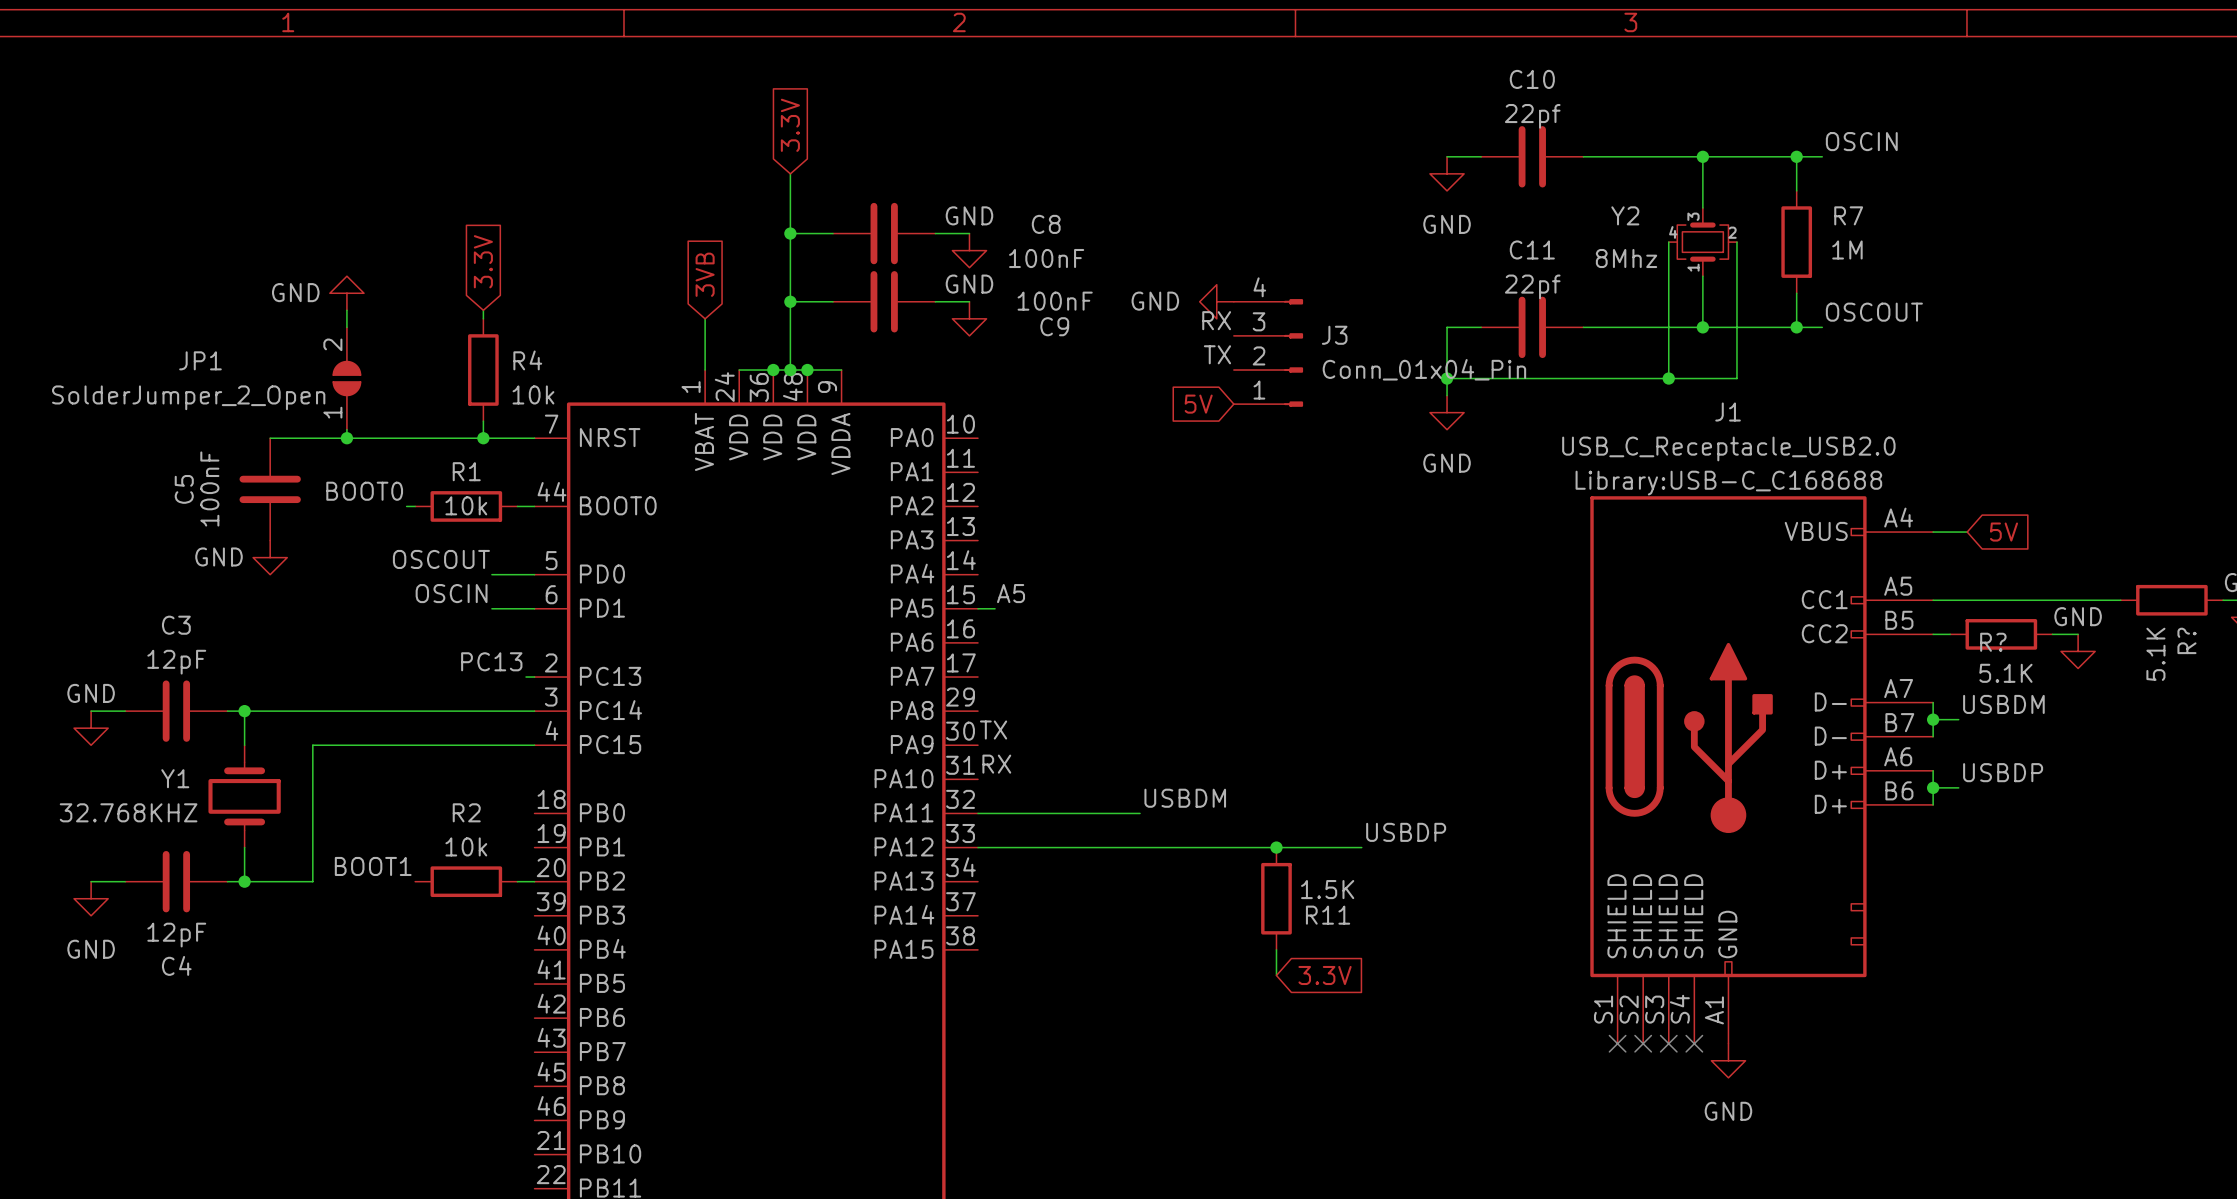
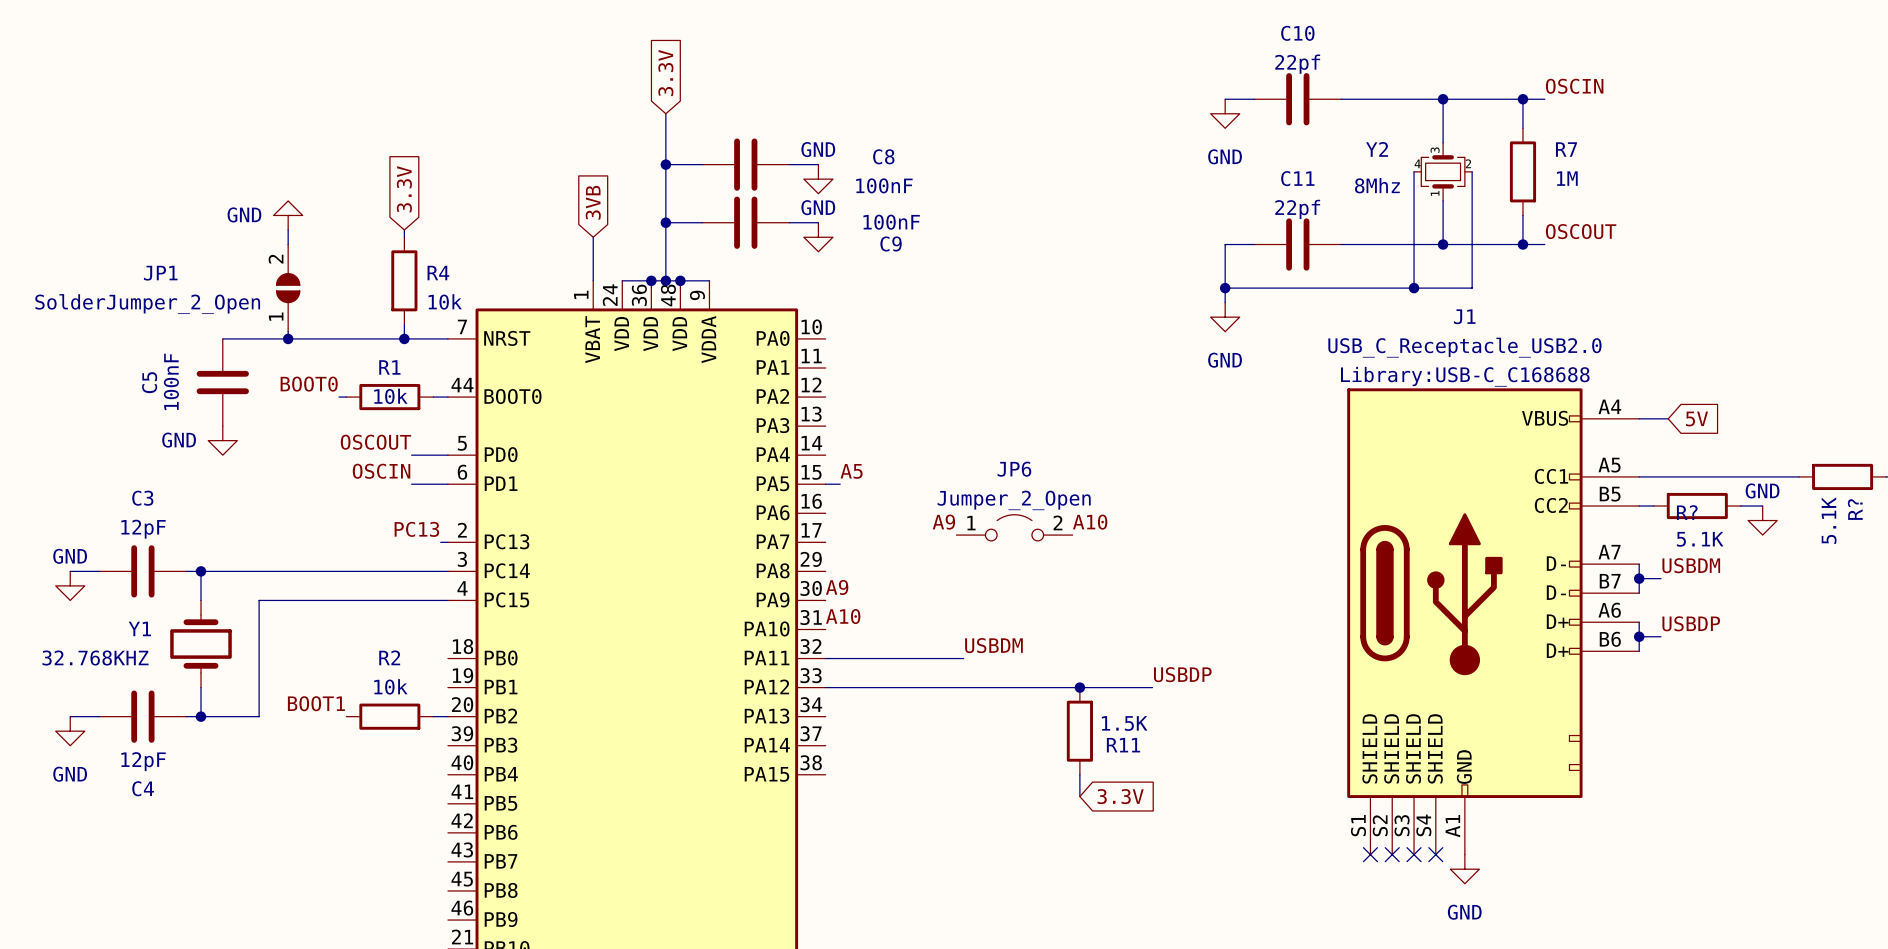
power symbol: GND (1216, 301) -> none
label: RX (1216, 320) -> none
J3: Conn_01x04_Pin (1268, 352) -> none
label: TX (1217, 354) -> none
global label: 5V (1198, 404) -> none
label: none -> A9 (943, 522)
label: none -> A10 (1090, 522)
JP6: none -> Jumper_2_Open (1014, 527)
label: TX (993, 730) -> A9 (837, 587)
label: RX (996, 764) -> A10 (843, 616)

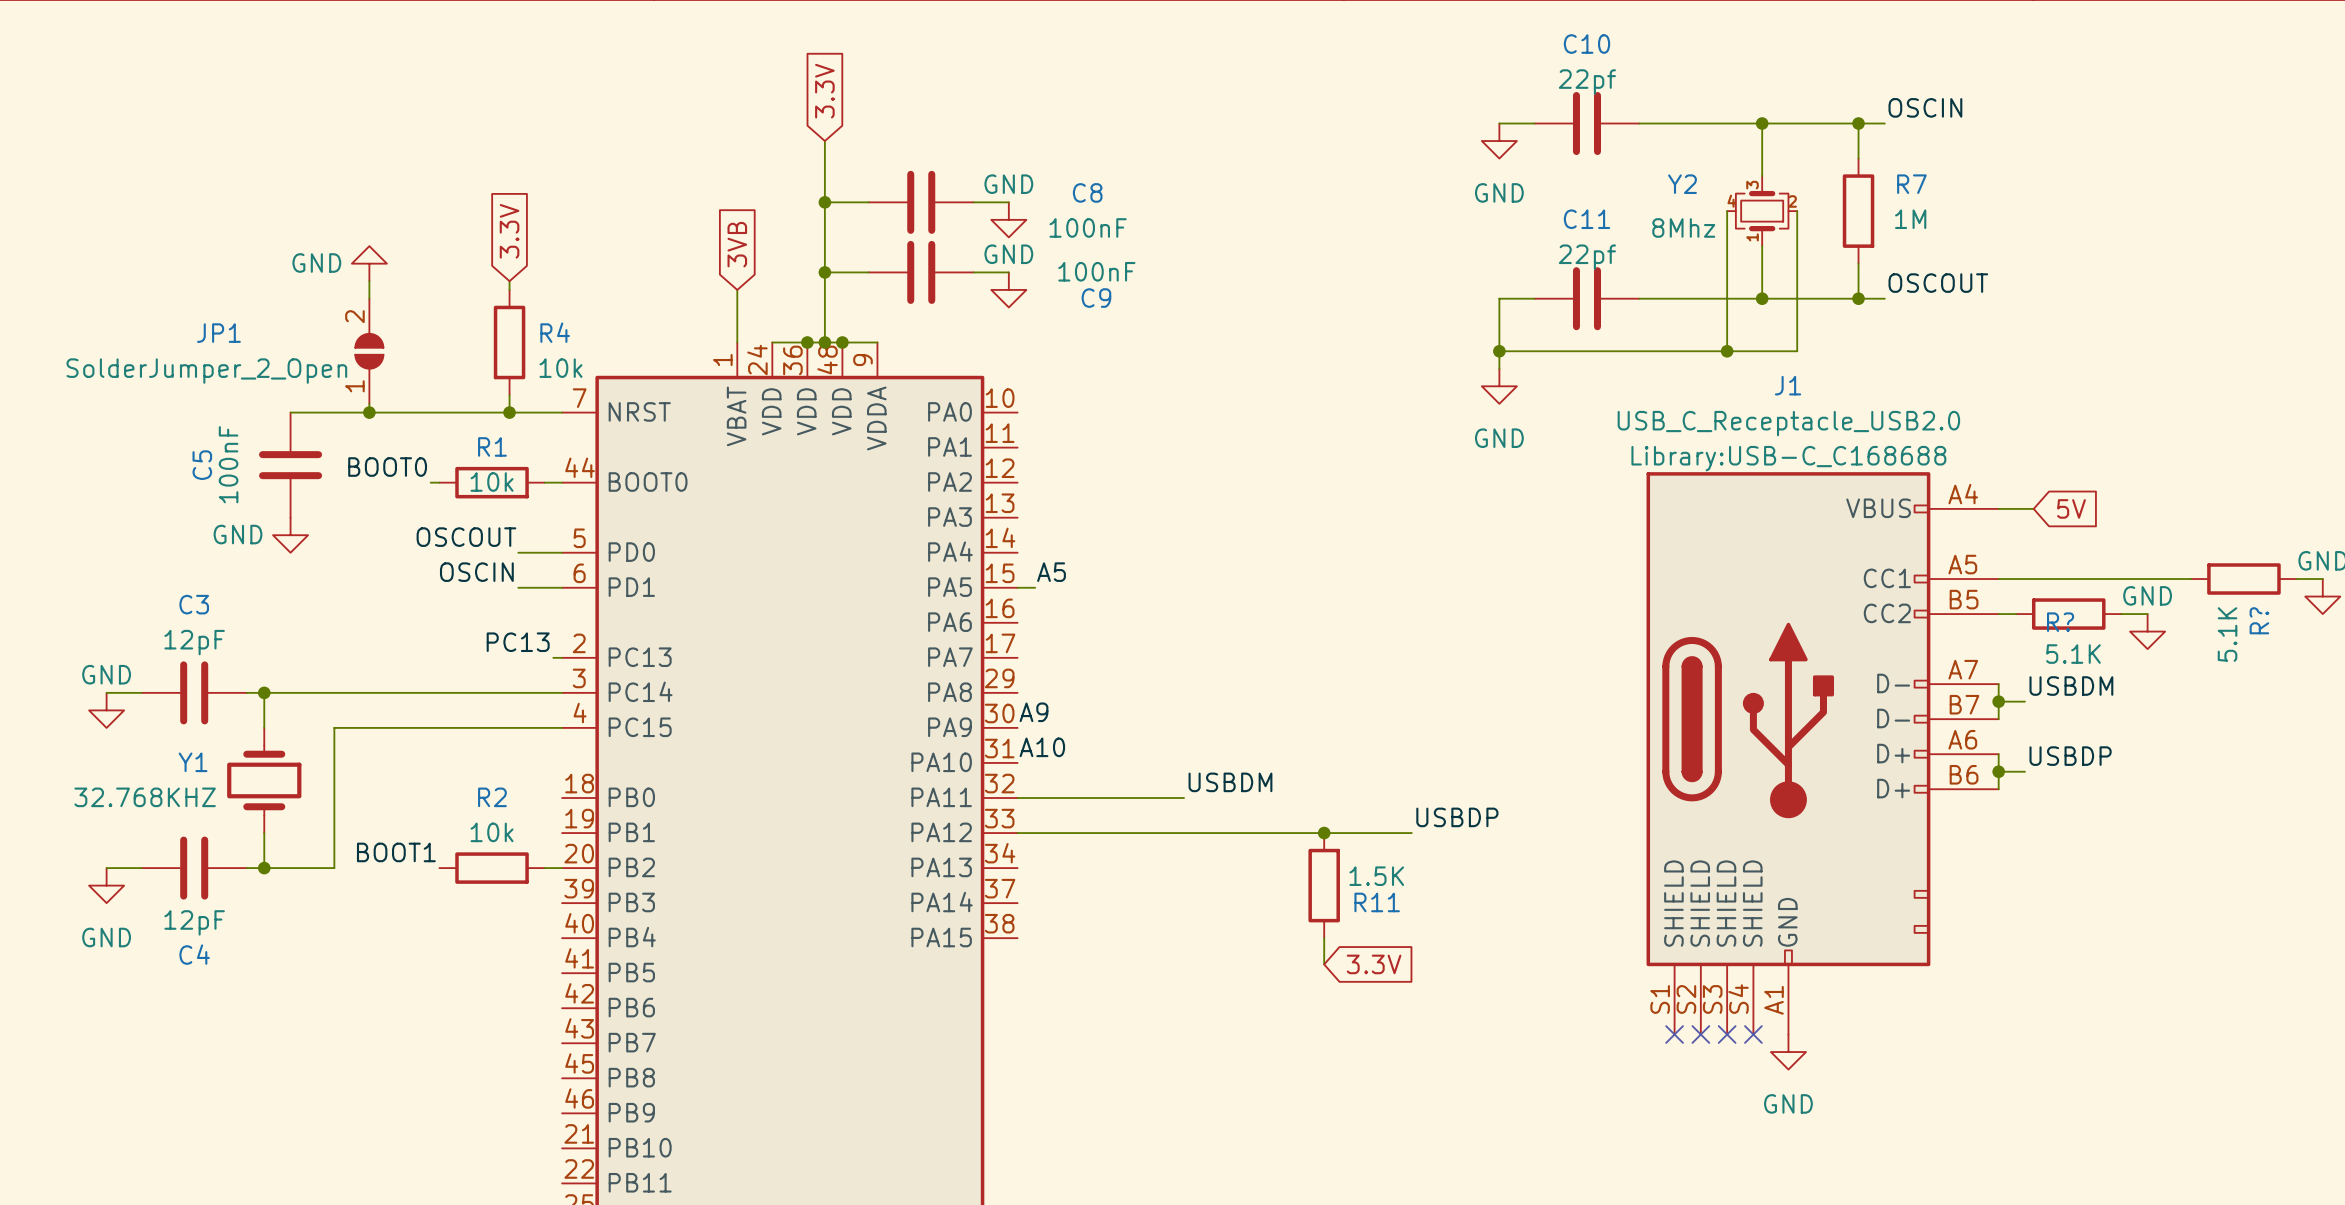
label: A9 (943, 522) -> none
label: A10 (1090, 522) -> none
JP6: Jumper_2_Open (1014, 527) -> none

